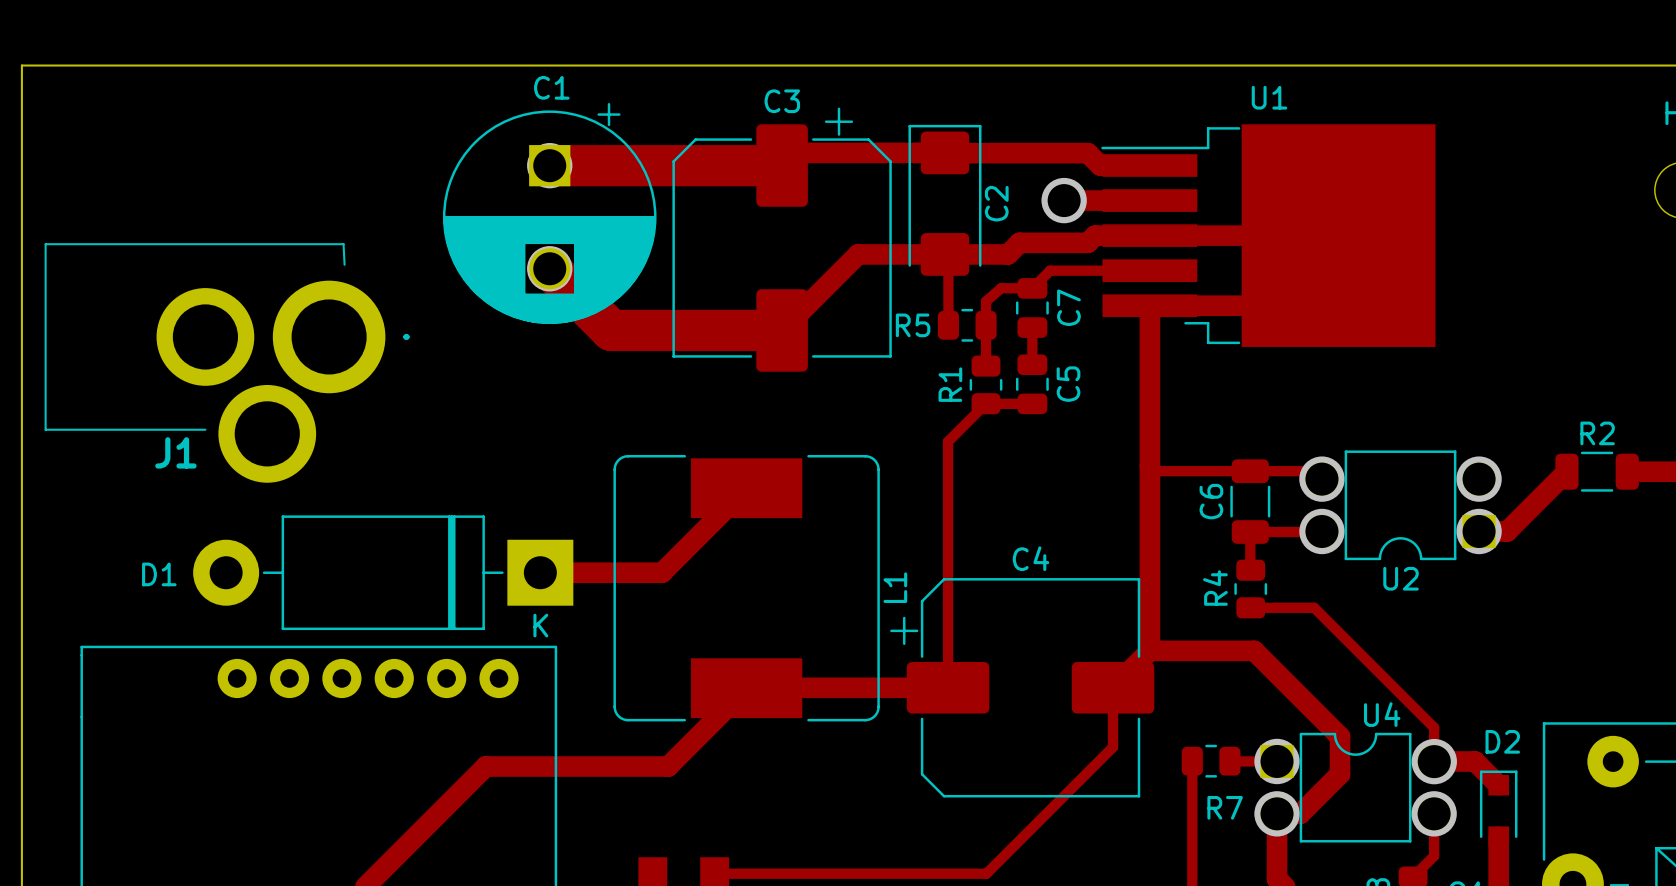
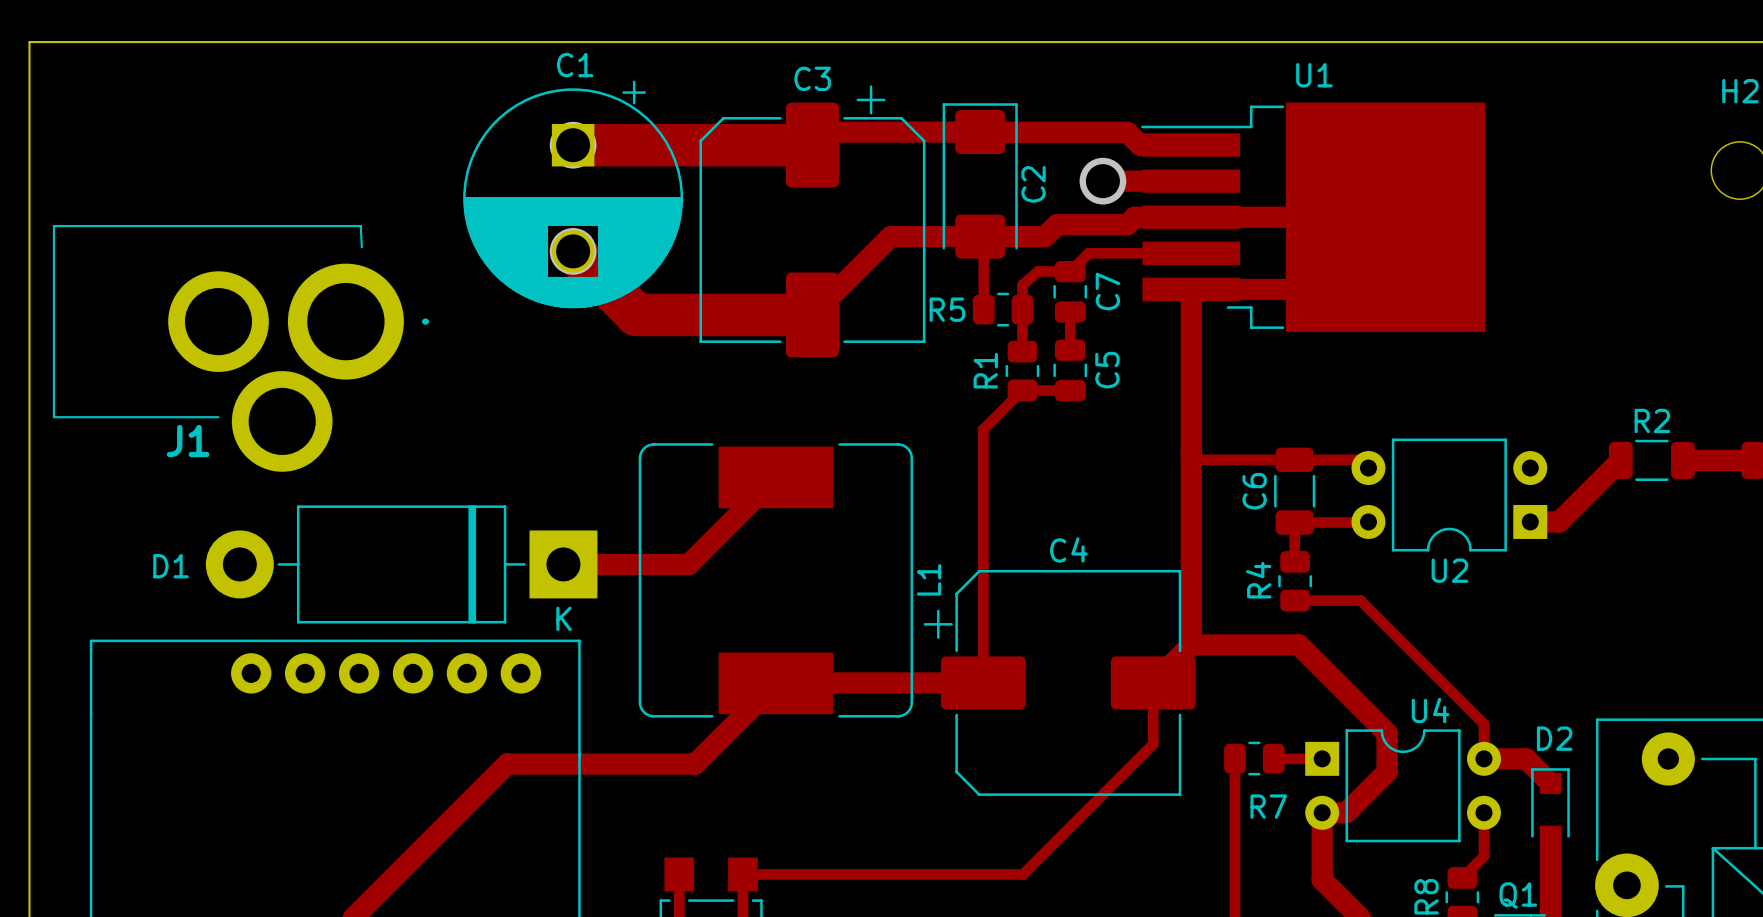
via: (1321, 479) -> none
via: (1479, 479) -> none
via: (1321, 531) -> none
via: (1479, 531) -> none
via: (1277, 761) -> none
via: (1434, 761) -> none
via: (1277, 813) -> none
via: (1434, 813) -> none

